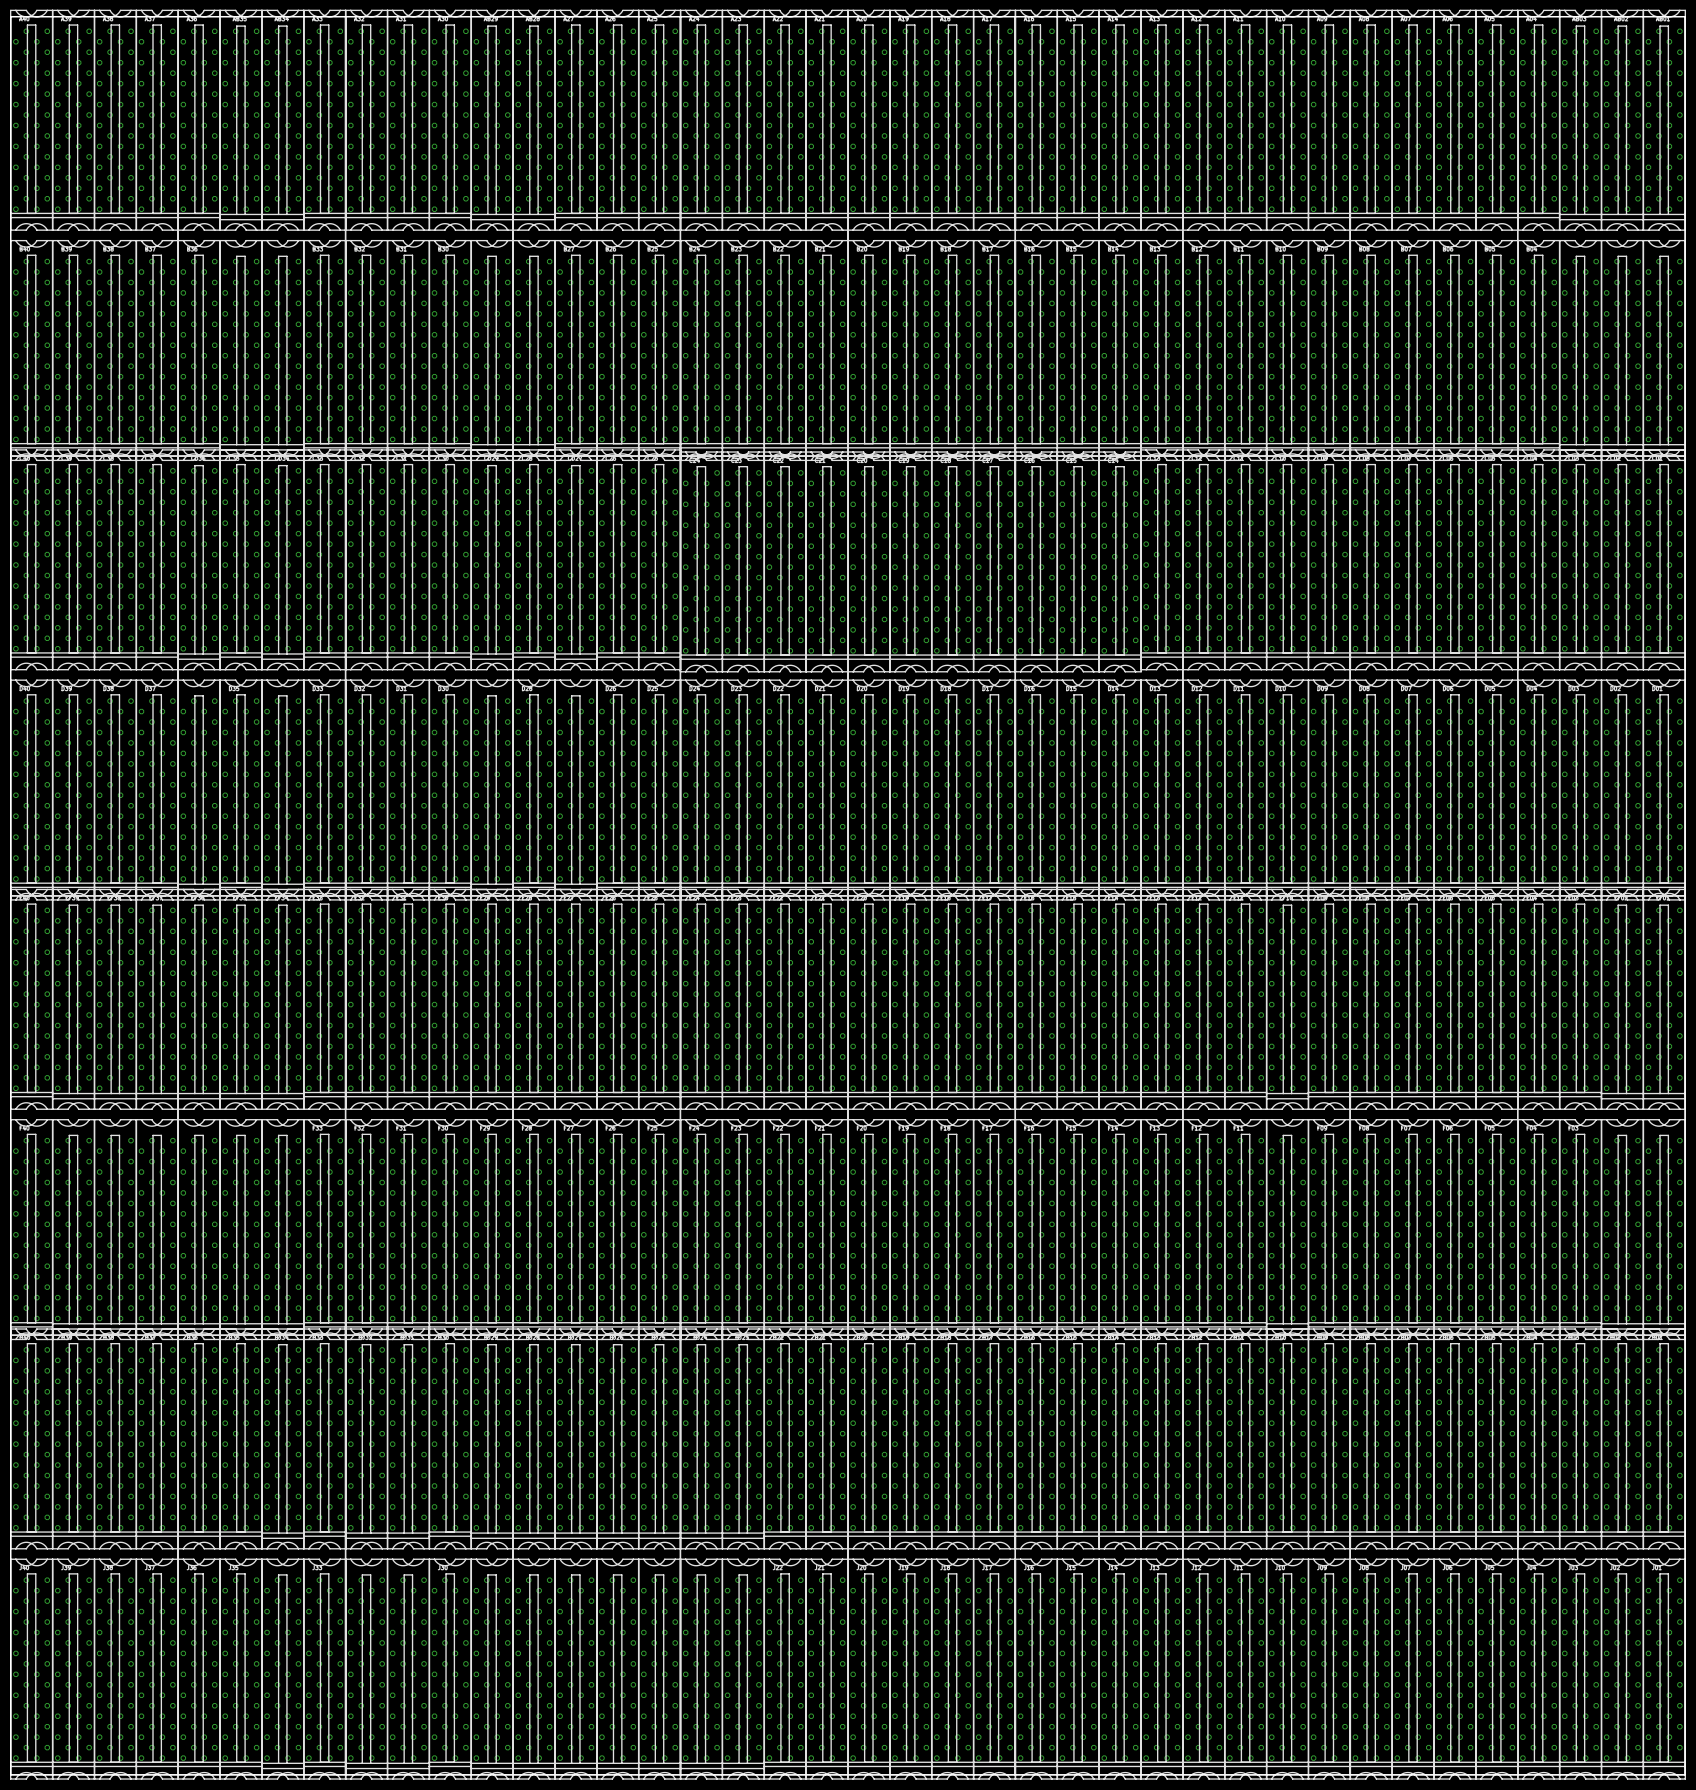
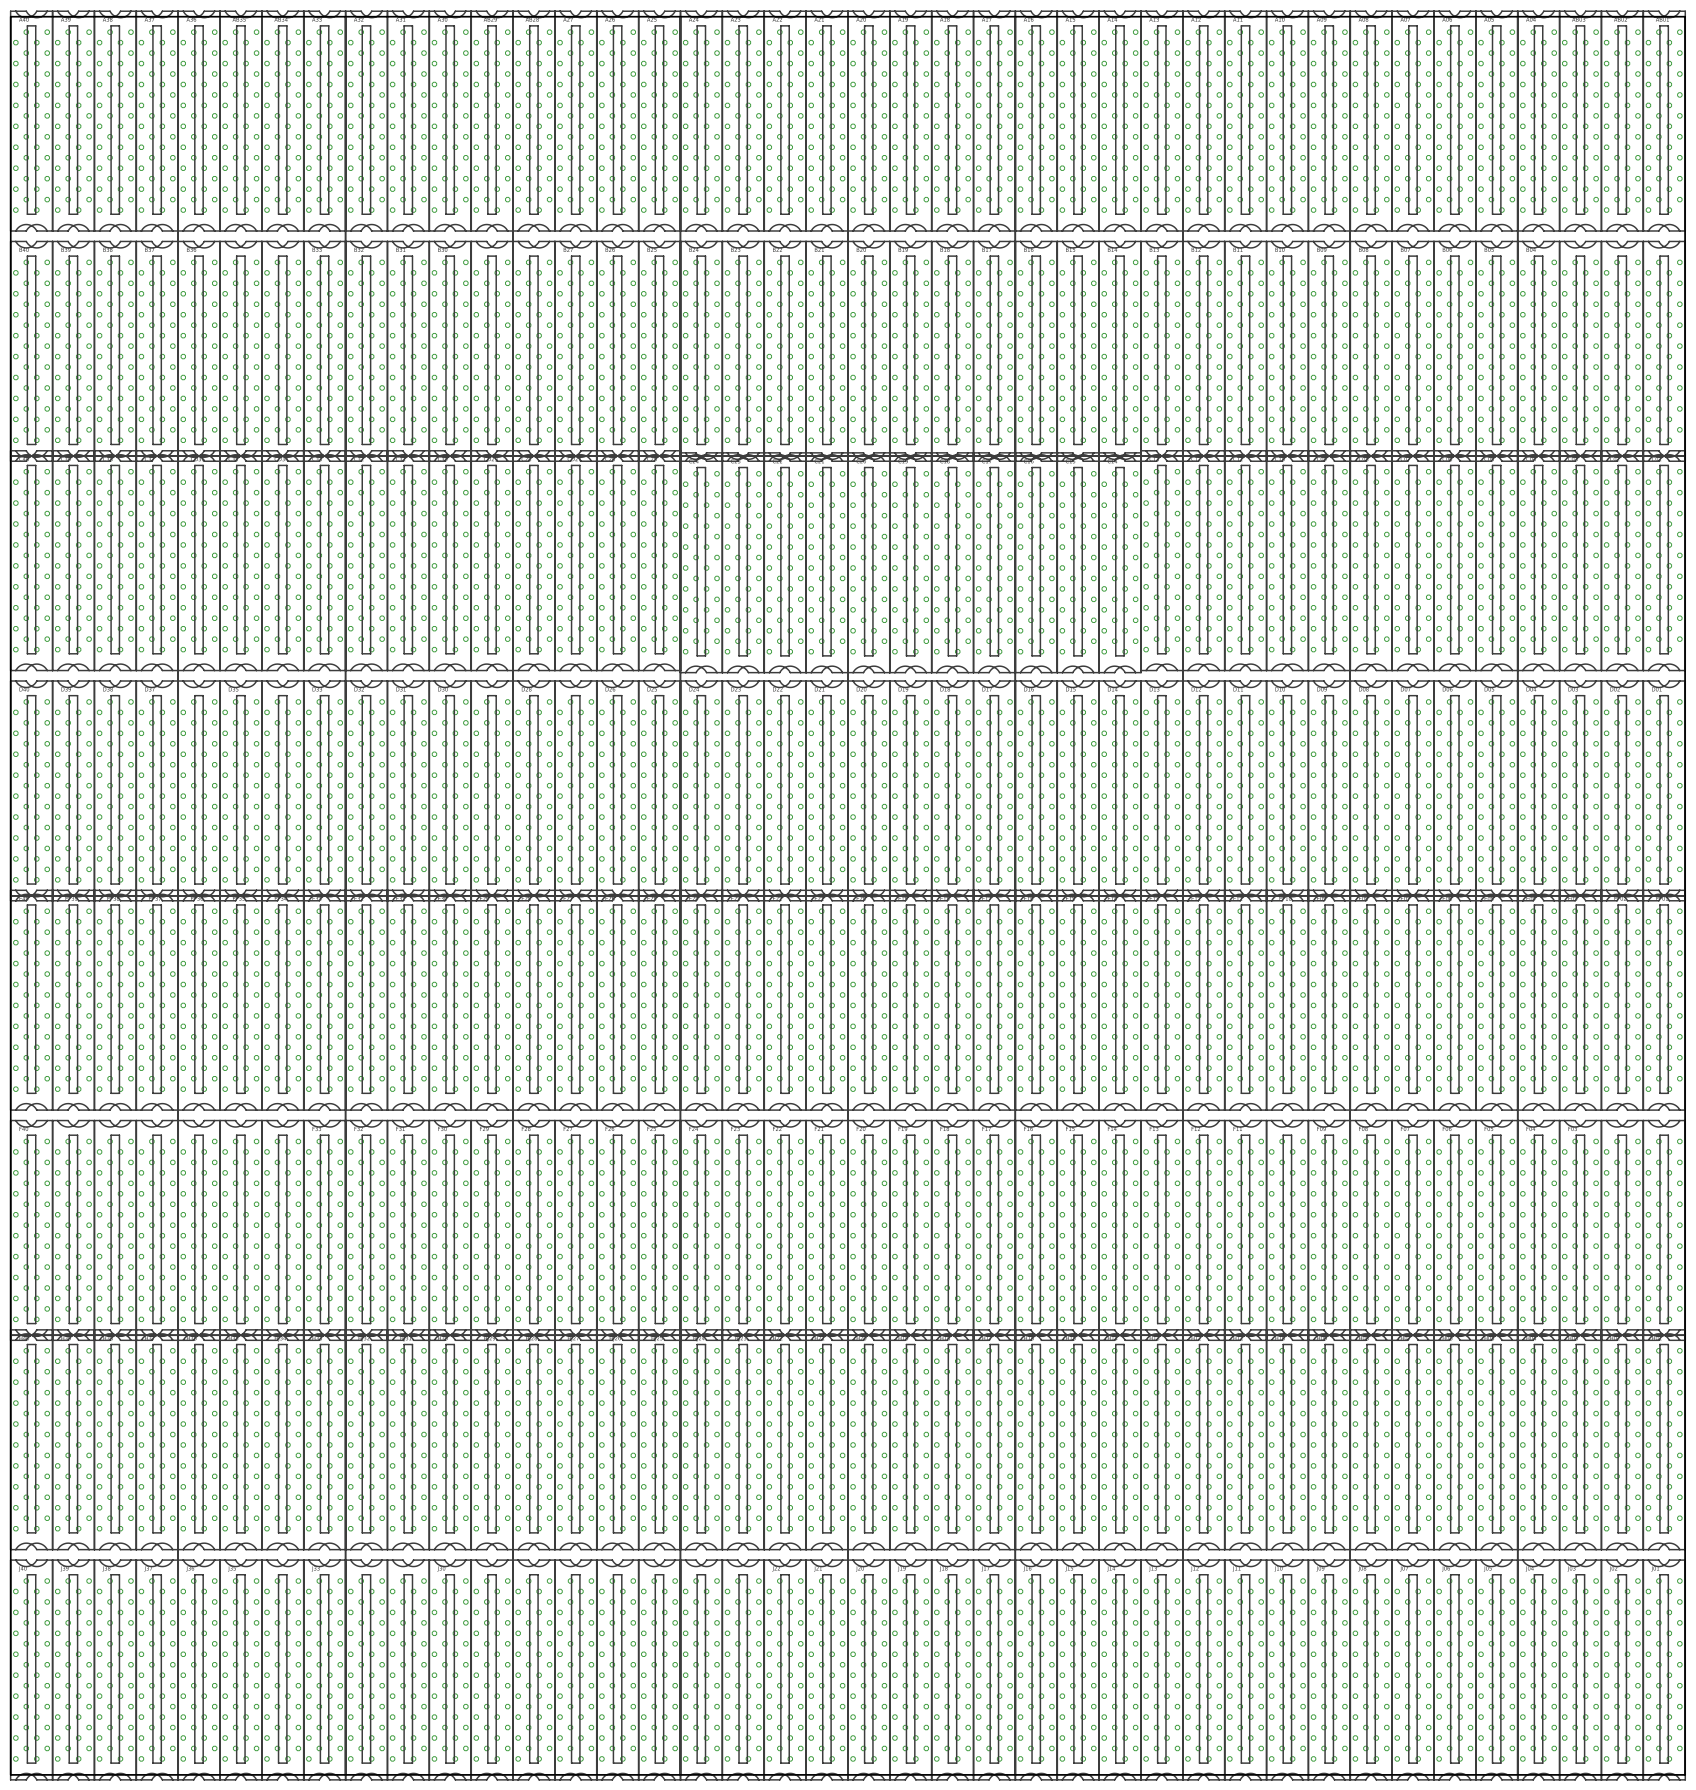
part footprint: [10, 10, 54, 231] -> [10, 11, 53, 232]
part footprint: [52, 10, 95, 231] -> [52, 11, 95, 232]
part footprint: [93, 10, 137, 231] -> [94, 11, 137, 232]
part footprint: [135, 10, 179, 231] -> [135, 11, 179, 232]
part footprint: [177, 10, 221, 231] -> [177, 11, 221, 232]
part footprint: [219, 10, 263, 461] -> [219, 11, 263, 462]
part footprint: [261, 10, 305, 461] -> [261, 11, 305, 462]
part footprint: [303, 10, 347, 231] -> [303, 11, 346, 232]
part footprint: [345, 10, 388, 231] -> [345, 11, 388, 232]
part footprint: [386, 10, 430, 231] -> [387, 11, 430, 232]
part footprint: [428, 10, 472, 231] -> [429, 11, 472, 232]
part footprint: [470, 10, 514, 461] -> [470, 11, 514, 462]
part footprint: [512, 10, 556, 461] -> [512, 11, 556, 462]
part footprint: [554, 10, 598, 231] -> [554, 11, 598, 232]
part footprint: [596, 10, 640, 231] -> [596, 11, 639, 232]
part footprint: [638, 10, 681, 231] -> [638, 11, 681, 232]
part footprint: [679, 10, 723, 231] -> [680, 11, 723, 232]
part footprint: [721, 10, 765, 231] -> [722, 11, 765, 232]
part footprint: [763, 10, 807, 231] -> [763, 11, 807, 232]
part footprint: [805, 10, 849, 231] -> [805, 11, 849, 232]
part footprint: [847, 10, 891, 231] -> [847, 11, 891, 232]
part footprint: [889, 10, 933, 231] -> [889, 11, 932, 232]
part footprint: [931, 10, 974, 231] -> [931, 11, 974, 232]
part footprint: [972, 10, 1016, 231] -> [973, 11, 1016, 232]
part footprint: [1014, 10, 1058, 231] -> [1015, 11, 1058, 232]
part footprint: [1056, 10, 1100, 231] -> [1056, 11, 1100, 232]
part footprint: [1098, 10, 1142, 231] -> [1098, 11, 1142, 232]
part footprint: [1140, 10, 1184, 231] -> [1140, 11, 1184, 232]
part footprint: [1182, 10, 1226, 231] -> [1182, 11, 1226, 232]
part footprint: [1224, 10, 1268, 231] -> [1224, 11, 1267, 232]
part footprint: [1266, 10, 1309, 231] -> [1266, 11, 1309, 232]
part footprint: [1307, 10, 1351, 231] -> [1308, 11, 1351, 232]
part footprint: [1349, 10, 1393, 231] -> [1349, 11, 1393, 232]
part footprint: [1391, 10, 1435, 231] -> [1391, 11, 1435, 232]
part footprint: [1433, 10, 1477, 231] -> [1433, 11, 1477, 232]
part footprint: [1475, 10, 1519, 231] -> [1475, 11, 1519, 232]
part footprint: [1517, 10, 1561, 231] -> [1517, 11, 1560, 232]
part footprint: [1559, 10, 1602, 461] -> [1559, 11, 1602, 462]
part footprint: [1600, 10, 1644, 461] -> [1601, 11, 1644, 462]
part footprint: [1642, 10, 1686, 461] -> [1643, 11, 1686, 462]
part footprint: [10, 240, 54, 461] -> [10, 241, 53, 462]
part footprint: [52, 240, 95, 461] -> [52, 241, 95, 462]
part footprint: [93, 240, 137, 461] -> [94, 241, 137, 462]
part footprint: [135, 240, 179, 461] -> [135, 241, 179, 462]
part footprint: [177, 240, 221, 461] -> [177, 241, 221, 462]
part footprint: [303, 240, 347, 461] -> [303, 241, 346, 462]
part footprint: [345, 240, 388, 461] -> [345, 241, 388, 462]
part footprint: [386, 240, 430, 461] -> [387, 241, 430, 462]
part footprint: [428, 240, 472, 461] -> [429, 241, 472, 462]
part footprint: [554, 240, 598, 461] -> [554, 241, 598, 462]
part footprint: [596, 240, 640, 461] -> [596, 241, 639, 462]
part footprint: [638, 240, 681, 461] -> [638, 241, 681, 462]
part footprint: [679, 240, 723, 461] -> [680, 241, 723, 462]
part footprint: [721, 240, 765, 461] -> [722, 241, 765, 462]
part footprint: [763, 240, 807, 461] -> [763, 241, 807, 462]
part footprint: [805, 240, 849, 461] -> [805, 241, 849, 462]
part footprint: [847, 240, 891, 461] -> [847, 241, 891, 462]
part footprint: [889, 240, 933, 461] -> [889, 241, 932, 462]
part footprint: [931, 240, 974, 461] -> [931, 241, 974, 462]
part footprint: [972, 240, 1016, 461] -> [973, 241, 1016, 462]
part footprint: [1014, 240, 1058, 461] -> [1015, 241, 1058, 462]
part footprint: [1056, 240, 1100, 461] -> [1056, 241, 1100, 462]
part footprint: [1098, 240, 1142, 461] -> [1098, 241, 1142, 462]
part footprint: [1140, 240, 1184, 461] -> [1140, 241, 1184, 462]
part footprint: [1182, 240, 1226, 461] -> [1182, 241, 1226, 462]
part footprint: [1224, 240, 1268, 461] -> [1224, 241, 1267, 462]
part footprint: [1266, 240, 1309, 461] -> [1266, 241, 1309, 462]
part footprint: [1307, 240, 1351, 461] -> [1308, 241, 1351, 462]
part footprint: [1349, 240, 1393, 461] -> [1349, 241, 1393, 462]
part footprint: [1391, 240, 1435, 461] -> [1391, 241, 1435, 462]
part footprint: [1433, 240, 1477, 461] -> [1433, 241, 1477, 462]
part footprint: [1475, 240, 1519, 461] -> [1475, 241, 1519, 462]
part footprint: [1517, 240, 1561, 461] -> [1517, 241, 1560, 462]
part footprint: [10, 449, 54, 670] -> [10, 450, 53, 671]
part footprint: [52, 449, 95, 670] -> [52, 450, 95, 671]
part footprint: [93, 449, 137, 670] -> [94, 450, 137, 671]
part footprint: [135, 449, 179, 670] -> [135, 450, 179, 671]
part footprint: [177, 449, 221, 901] -> [177, 450, 221, 901]
part footprint: [219, 449, 263, 670] -> [219, 450, 263, 671]
part footprint: [261, 449, 305, 901] -> [261, 450, 305, 901]
part footprint: [303, 449, 347, 670] -> [303, 450, 346, 671]
part footprint: [345, 449, 388, 670] -> [345, 450, 388, 671]
part footprint: [386, 449, 430, 670] -> [387, 450, 430, 671]
part footprint: [428, 449, 472, 670] -> [429, 450, 472, 671]
part footprint: [470, 449, 514, 901] -> [470, 450, 514, 901]
part footprint: [512, 449, 556, 670] -> [512, 450, 556, 671]
part footprint: [554, 449, 598, 901] -> [554, 450, 598, 901]
part footprint: [596, 449, 640, 670] -> [596, 450, 639, 671]
part footprint: [638, 449, 681, 670] -> [638, 450, 681, 671]
part footprint: [1140, 449, 1184, 670] -> [1140, 450, 1184, 671]
part footprint: [1182, 449, 1226, 670] -> [1182, 450, 1226, 671]
part footprint: [1224, 449, 1268, 670] -> [1224, 450, 1267, 671]
part footprint: [1266, 449, 1309, 670] -> [1266, 450, 1309, 671]
part footprint: [1307, 449, 1351, 670] -> [1308, 450, 1351, 671]
part footprint: [1349, 449, 1393, 670] -> [1349, 450, 1393, 671]
part footprint: [1391, 449, 1435, 670] -> [1391, 450, 1435, 671]
part footprint: [1433, 449, 1477, 670] -> [1433, 450, 1477, 671]
part footprint: [1475, 449, 1519, 670] -> [1475, 450, 1519, 671]
part footprint: [1517, 449, 1561, 670] -> [1517, 450, 1560, 671]
part footprint: [1559, 449, 1602, 670] -> [1559, 450, 1602, 671]
part footprint: [1600, 449, 1644, 670] -> [1601, 450, 1644, 671]
part footprint: [1642, 449, 1686, 670] -> [1643, 450, 1686, 671]
part footprint: [679, 451, 723, 672] -> [680, 452, 723, 673]
part footprint: [721, 451, 765, 672] -> [722, 452, 765, 673]
part footprint: [763, 451, 807, 672] -> [763, 452, 807, 673]
part footprint: [805, 451, 849, 672] -> [805, 452, 849, 673]
part footprint: [847, 451, 891, 672] -> [847, 452, 891, 673]
part footprint: [889, 451, 933, 672] -> [889, 452, 932, 673]
part footprint: [931, 451, 974, 672] -> [931, 452, 974, 673]
part footprint: [972, 451, 1016, 672] -> [973, 452, 1016, 673]
part footprint: [1014, 451, 1058, 672] -> [1015, 452, 1058, 673]
part footprint: [1056, 451, 1100, 672] -> [1056, 452, 1100, 673]
part footprint: [1098, 451, 1142, 672] -> [1098, 452, 1142, 673]
part footprint: [10, 679, 54, 901] -> [10, 680, 53, 901]
part footprint: [52, 679, 95, 901] -> [52, 680, 95, 901]
part footprint: [93, 679, 137, 901] -> [94, 680, 137, 901]
part footprint: [135, 679, 179, 901] -> [135, 680, 179, 901]
part footprint: [219, 679, 263, 901] -> [219, 680, 263, 901]
part footprint: [303, 679, 347, 901] -> [303, 680, 346, 901]
part footprint: [345, 679, 388, 901] -> [345, 680, 388, 901]
part footprint: [386, 679, 430, 901] -> [387, 680, 430, 901]
part footprint: [428, 679, 472, 901] -> [429, 680, 472, 901]
part footprint: [512, 679, 556, 901] -> [512, 680, 556, 901]
part footprint: [596, 679, 640, 901] -> [596, 680, 639, 901]
part footprint: [638, 679, 681, 901] -> [638, 680, 681, 901]
part footprint: [679, 679, 723, 901] -> [680, 680, 723, 901]
part footprint: [721, 679, 765, 901] -> [722, 680, 765, 901]
part footprint: [763, 679, 807, 901] -> [763, 680, 807, 901]
part footprint: [805, 679, 849, 901] -> [805, 680, 849, 901]
part footprint: [847, 679, 891, 901] -> [847, 680, 891, 901]
part footprint: [889, 679, 933, 901] -> [889, 680, 932, 901]
part footprint: [931, 679, 974, 901] -> [931, 680, 974, 901]
part footprint: [972, 679, 1016, 901] -> [973, 680, 1016, 901]
part footprint: [1014, 679, 1058, 901] -> [1015, 680, 1058, 901]
part footprint: [1056, 679, 1100, 901] -> [1056, 680, 1100, 901]
part footprint: [1098, 679, 1142, 901] -> [1098, 680, 1142, 901]
part footprint: [1140, 679, 1184, 901] -> [1140, 680, 1184, 901]
part footprint: [1182, 679, 1226, 901] -> [1182, 680, 1226, 901]
part footprint: [1224, 679, 1268, 901] -> [1224, 680, 1267, 901]
part footprint: [1266, 679, 1309, 901] -> [1266, 680, 1309, 901]
part footprint: [1307, 679, 1351, 901] -> [1308, 680, 1351, 901]
part footprint: [1349, 679, 1393, 901] -> [1349, 680, 1393, 901]
part footprint: [1391, 679, 1435, 901] -> [1391, 680, 1435, 901]
part footprint: [1433, 679, 1477, 901] -> [1433, 680, 1477, 901]
part footprint: [1475, 679, 1519, 901] -> [1475, 680, 1519, 901]
part footprint: [1517, 679, 1561, 901] -> [1517, 680, 1560, 901]
part footprint: [1559, 679, 1602, 901] -> [1559, 680, 1602, 901]
part footprint: [1600, 679, 1644, 901] -> [1601, 680, 1644, 901]
part footprint: [1642, 679, 1686, 901] -> [1643, 680, 1686, 901]
part footprint: [10, 889, 54, 1110] -> [10, 890, 53, 1111]
part footprint: [52, 889, 95, 1340] -> [52, 890, 95, 1341]
part footprint: [93, 889, 137, 1340] -> [94, 890, 137, 1341]
part footprint: [135, 889, 179, 1340] -> [135, 890, 179, 1341]
part footprint: [177, 889, 221, 1340] -> [177, 890, 221, 1341]
part footprint: [219, 889, 263, 1340] -> [219, 890, 263, 1341]
part footprint: [261, 889, 305, 1340] -> [261, 890, 305, 1341]
part footprint: [303, 889, 347, 1110] -> [303, 890, 346, 1111]
part footprint: [345, 889, 388, 1110] -> [345, 890, 388, 1111]
part footprint: [386, 889, 430, 1110] -> [387, 890, 430, 1111]
part footprint: [428, 889, 472, 1110] -> [429, 890, 472, 1111]
part footprint: [470, 889, 514, 1110] -> [470, 890, 514, 1111]
part footprint: [512, 889, 556, 1110] -> [512, 890, 556, 1111]
part footprint: [554, 889, 598, 1110] -> [554, 890, 598, 1111]
part footprint: [596, 889, 640, 1110] -> [596, 890, 639, 1111]
part footprint: [638, 889, 681, 1110] -> [638, 890, 681, 1111]
part footprint: [679, 889, 723, 1110] -> [680, 890, 723, 1111]
part footprint: [721, 889, 765, 1110] -> [722, 890, 765, 1111]
part footprint: [763, 889, 807, 1110] -> [763, 890, 807, 1111]
part footprint: [805, 889, 849, 1110] -> [805, 890, 849, 1111]
part footprint: [847, 889, 891, 1110] -> [847, 890, 891, 1111]
part footprint: [889, 889, 933, 1110] -> [889, 890, 932, 1111]
part footprint: [931, 889, 974, 1110] -> [931, 890, 974, 1111]
part footprint: [972, 889, 1016, 1110] -> [973, 890, 1016, 1111]
part footprint: [1014, 889, 1058, 1110] -> [1015, 890, 1058, 1111]
part footprint: [1056, 889, 1100, 1110] -> [1056, 890, 1100, 1111]
part footprint: [1098, 889, 1142, 1110] -> [1098, 890, 1142, 1111]
part footprint: [1140, 889, 1184, 1110] -> [1140, 890, 1184, 1111]
part footprint: [1182, 889, 1226, 1110] -> [1182, 890, 1226, 1111]
part footprint: [1224, 889, 1268, 1110] -> [1224, 890, 1267, 1111]
part footprint: [1266, 889, 1309, 1340] -> [1266, 890, 1309, 1341]
part footprint: [1307, 889, 1351, 1110] -> [1308, 890, 1351, 1111]
part footprint: [1349, 889, 1393, 1110] -> [1349, 890, 1393, 1111]
part footprint: [1391, 889, 1435, 1110] -> [1391, 890, 1435, 1111]
part footprint: [1433, 889, 1477, 1110] -> [1433, 890, 1477, 1111]
part footprint: [1475, 889, 1519, 1110] -> [1475, 890, 1519, 1111]
part footprint: [1517, 889, 1561, 1110] -> [1517, 890, 1560, 1111]
part footprint: [1559, 889, 1602, 1110] -> [1559, 890, 1602, 1111]
part footprint: [1600, 889, 1644, 1340] -> [1601, 890, 1644, 1341]
part footprint: [1642, 889, 1686, 1340] -> [1643, 890, 1686, 1341]
part footprint: [10, 1119, 54, 1340] -> [10, 1120, 53, 1341]
part footprint: [303, 1119, 347, 1340] -> [303, 1120, 346, 1341]
part footprint: [345, 1119, 388, 1340] -> [345, 1120, 388, 1341]
part footprint: [386, 1119, 430, 1340] -> [387, 1120, 430, 1341]
part footprint: [428, 1119, 472, 1340] -> [429, 1120, 472, 1341]
part footprint: [470, 1119, 514, 1340] -> [470, 1120, 514, 1341]
part footprint: [512, 1119, 556, 1340] -> [512, 1120, 556, 1341]
part footprint: [554, 1119, 598, 1340] -> [554, 1120, 598, 1341]
part footprint: [596, 1119, 640, 1340] -> [596, 1120, 639, 1341]
part footprint: [638, 1119, 681, 1340] -> [638, 1120, 681, 1341]
part footprint: [679, 1119, 723, 1340] -> [680, 1120, 723, 1341]
part footprint: [721, 1119, 765, 1340] -> [722, 1120, 765, 1341]
part footprint: [763, 1119, 807, 1340] -> [763, 1120, 807, 1341]
part footprint: [805, 1119, 849, 1340] -> [805, 1120, 849, 1341]
part footprint: [847, 1119, 891, 1340] -> [847, 1120, 891, 1341]
part footprint: [889, 1119, 933, 1340] -> [889, 1120, 932, 1341]
part footprint: [931, 1119, 974, 1340] -> [931, 1120, 974, 1341]
part footprint: [972, 1119, 1016, 1340] -> [973, 1120, 1016, 1341]
part footprint: [1014, 1119, 1058, 1340] -> [1015, 1120, 1058, 1341]
part footprint: [1056, 1119, 1100, 1340] -> [1056, 1120, 1100, 1341]
part footprint: [1098, 1119, 1142, 1340] -> [1098, 1120, 1142, 1341]
part footprint: [1140, 1119, 1184, 1340] -> [1140, 1120, 1184, 1341]
part footprint: [1182, 1119, 1226, 1340] -> [1182, 1120, 1226, 1341]
part footprint: [1224, 1119, 1268, 1340] -> [1224, 1120, 1267, 1341]
part footprint: [1307, 1119, 1351, 1340] -> [1308, 1120, 1351, 1341]
part footprint: [1349, 1119, 1393, 1340] -> [1349, 1120, 1393, 1341]
part footprint: [1391, 1119, 1435, 1340] -> [1391, 1120, 1435, 1341]
part footprint: [1433, 1119, 1477, 1340] -> [1433, 1120, 1477, 1341]
part footprint: [1475, 1119, 1519, 1340] -> [1475, 1120, 1519, 1341]
part footprint: [1517, 1119, 1561, 1340] -> [1517, 1120, 1560, 1341]
part footprint: [1559, 1119, 1602, 1340] -> [1559, 1120, 1602, 1341]
part footprint: [10, 1328, 54, 1549] -> [10, 1329, 53, 1550]
part footprint: [52, 1328, 95, 1549] -> [52, 1329, 95, 1550]
part footprint: [93, 1328, 137, 1549] -> [94, 1329, 137, 1550]
part footprint: [135, 1328, 179, 1549] -> [135, 1329, 179, 1550]
part footprint: [177, 1328, 221, 1549] -> [177, 1329, 221, 1550]
part footprint: [219, 1328, 263, 1549] -> [219, 1329, 263, 1550]
part footprint: [261, 1328, 305, 1780] -> [261, 1329, 305, 1781]
part footprint: [303, 1328, 347, 1549] -> [303, 1329, 346, 1550]
part footprint: [345, 1328, 388, 1780] -> [345, 1329, 388, 1781]
part footprint: [386, 1328, 430, 1780] -> [387, 1329, 430, 1781]
part footprint: [428, 1328, 472, 1549] -> [429, 1329, 472, 1550]
part footprint: [470, 1328, 514, 1780] -> [470, 1329, 514, 1781]
part footprint: [512, 1328, 556, 1780] -> [512, 1329, 556, 1781]
part footprint: [554, 1328, 598, 1780] -> [554, 1329, 598, 1781]
part footprint: [596, 1328, 640, 1780] -> [596, 1329, 639, 1781]
part footprint: [638, 1328, 681, 1780] -> [638, 1329, 681, 1781]
part footprint: [679, 1328, 723, 1780] -> [680, 1329, 723, 1781]
part footprint: [721, 1328, 765, 1780] -> [722, 1329, 765, 1781]
part footprint: [763, 1328, 807, 1549] -> [763, 1329, 807, 1550]
part footprint: [805, 1328, 849, 1549] -> [805, 1329, 849, 1550]
part footprint: [847, 1328, 891, 1549] -> [847, 1329, 891, 1550]
part footprint: [889, 1328, 933, 1549] -> [889, 1329, 932, 1550]
part footprint: [931, 1328, 974, 1549] -> [931, 1329, 974, 1550]
part footprint: [972, 1328, 1016, 1549] -> [973, 1329, 1016, 1550]
part footprint: [1014, 1328, 1058, 1549] -> [1015, 1329, 1058, 1550]
part footprint: [1056, 1328, 1100, 1549] -> [1056, 1329, 1100, 1550]
part footprint: [1098, 1328, 1142, 1549] -> [1098, 1329, 1142, 1550]
part footprint: [1140, 1328, 1184, 1549] -> [1140, 1329, 1184, 1550]
part footprint: [1182, 1328, 1226, 1549] -> [1182, 1329, 1226, 1550]
part footprint: [1224, 1328, 1268, 1549] -> [1224, 1329, 1267, 1550]
part footprint: [1266, 1328, 1309, 1549] -> [1266, 1329, 1309, 1550]
part footprint: [1307, 1328, 1351, 1549] -> [1308, 1329, 1351, 1550]
part footprint: [1349, 1328, 1393, 1549] -> [1349, 1329, 1393, 1550]
part footprint: [1391, 1328, 1435, 1549] -> [1391, 1329, 1435, 1550]
part footprint: [1433, 1328, 1477, 1549] -> [1433, 1329, 1477, 1550]
part footprint: [1475, 1328, 1519, 1549] -> [1475, 1329, 1519, 1550]
part footprint: [1517, 1328, 1561, 1549] -> [1517, 1329, 1560, 1550]
part footprint: [1559, 1328, 1602, 1549] -> [1559, 1329, 1602, 1550]
part footprint: [1600, 1328, 1644, 1549] -> [1601, 1329, 1644, 1550]
part footprint: [1642, 1328, 1686, 1549] -> [1643, 1329, 1686, 1550]
part footprint: [10, 1559, 54, 1780] -> [10, 1559, 53, 1781]
part footprint: [52, 1559, 95, 1780] -> [52, 1559, 95, 1781]
part footprint: [93, 1559, 137, 1780] -> [94, 1559, 137, 1781]
part footprint: [135, 1559, 179, 1780] -> [135, 1559, 179, 1781]
part footprint: [177, 1559, 221, 1780] -> [177, 1559, 221, 1781]
part footprint: [219, 1559, 263, 1780] -> [219, 1559, 263, 1781]
part footprint: [303, 1559, 347, 1780] -> [303, 1559, 346, 1781]
part footprint: [428, 1559, 472, 1780] -> [429, 1559, 472, 1781]
part footprint: [763, 1559, 807, 1780] -> [763, 1559, 807, 1781]
part footprint: [805, 1559, 849, 1780] -> [805, 1559, 849, 1781]
part footprint: [847, 1559, 891, 1780] -> [847, 1559, 891, 1781]
part footprint: [889, 1559, 933, 1780] -> [889, 1559, 932, 1781]
part footprint: [931, 1559, 974, 1780] -> [931, 1559, 974, 1781]
part footprint: [972, 1559, 1016, 1780] -> [973, 1559, 1016, 1781]
part footprint: [1014, 1559, 1058, 1780] -> [1015, 1559, 1058, 1781]
part footprint: [1056, 1559, 1100, 1780] -> [1056, 1559, 1100, 1781]
part footprint: [1098, 1559, 1142, 1780] -> [1098, 1559, 1142, 1781]
part footprint: [1140, 1559, 1184, 1780] -> [1140, 1559, 1184, 1781]
part footprint: [1182, 1559, 1226, 1780] -> [1182, 1559, 1226, 1781]
part footprint: [1224, 1559, 1268, 1780] -> [1224, 1559, 1267, 1781]
part footprint: [1266, 1559, 1309, 1780] -> [1266, 1559, 1309, 1781]
part footprint: [1307, 1559, 1351, 1780] -> [1308, 1559, 1351, 1781]
part footprint: [1349, 1559, 1393, 1780] -> [1349, 1559, 1393, 1781]
part footprint: [1391, 1559, 1435, 1780] -> [1391, 1559, 1435, 1781]
part footprint: [1433, 1559, 1477, 1780] -> [1433, 1559, 1477, 1781]
part footprint: [1475, 1559, 1519, 1780] -> [1475, 1559, 1519, 1781]
part footprint: [1517, 1559, 1561, 1780] -> [1517, 1559, 1560, 1781]
part footprint: [1559, 1559, 1602, 1780] -> [1559, 1559, 1602, 1781]
part footprint: [1600, 1559, 1644, 1780] -> [1601, 1559, 1644, 1781]
part footprint: [1642, 1559, 1686, 1780] -> [1643, 1559, 1686, 1781]

